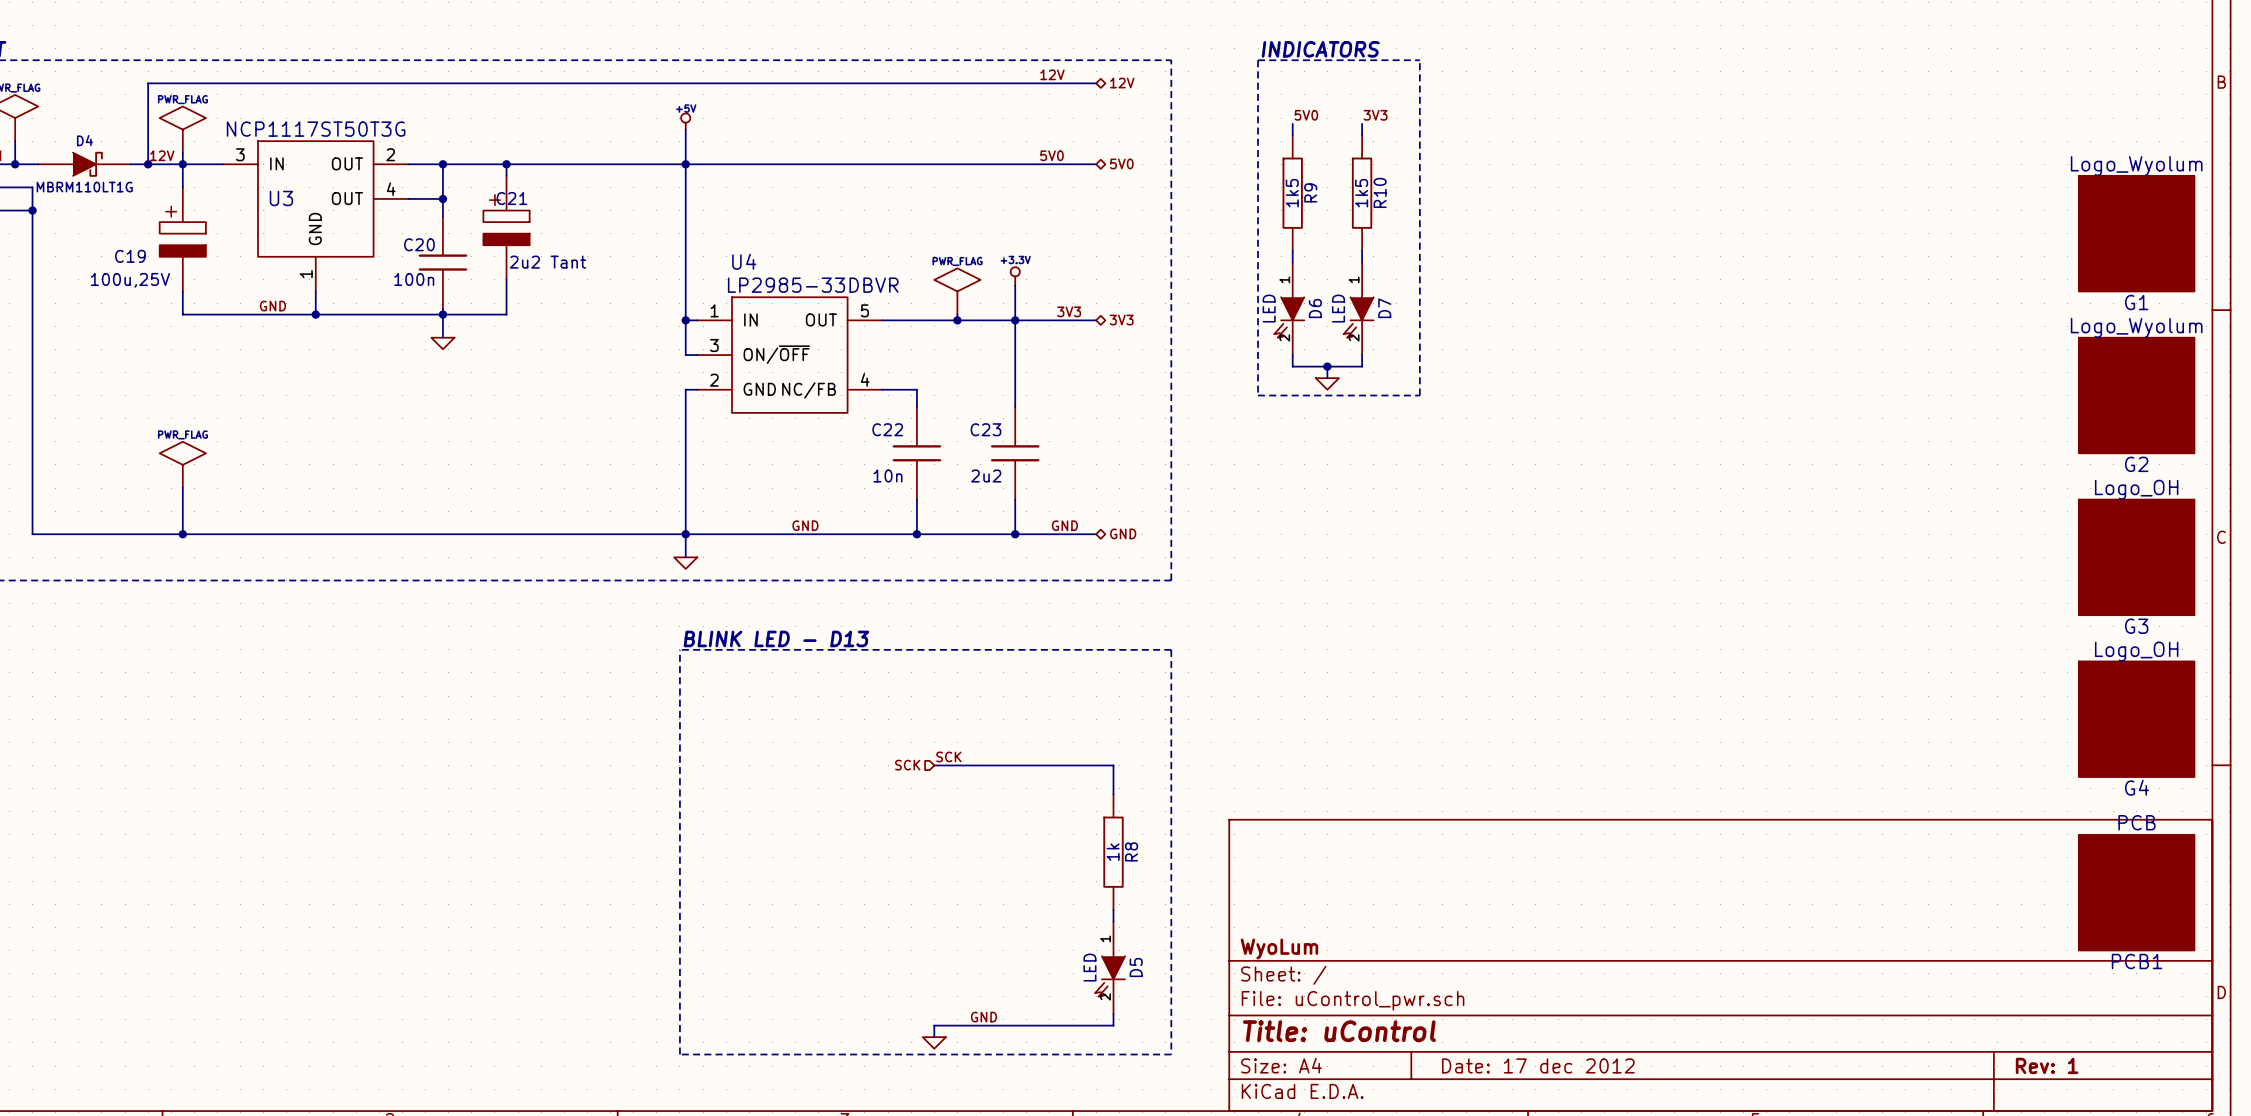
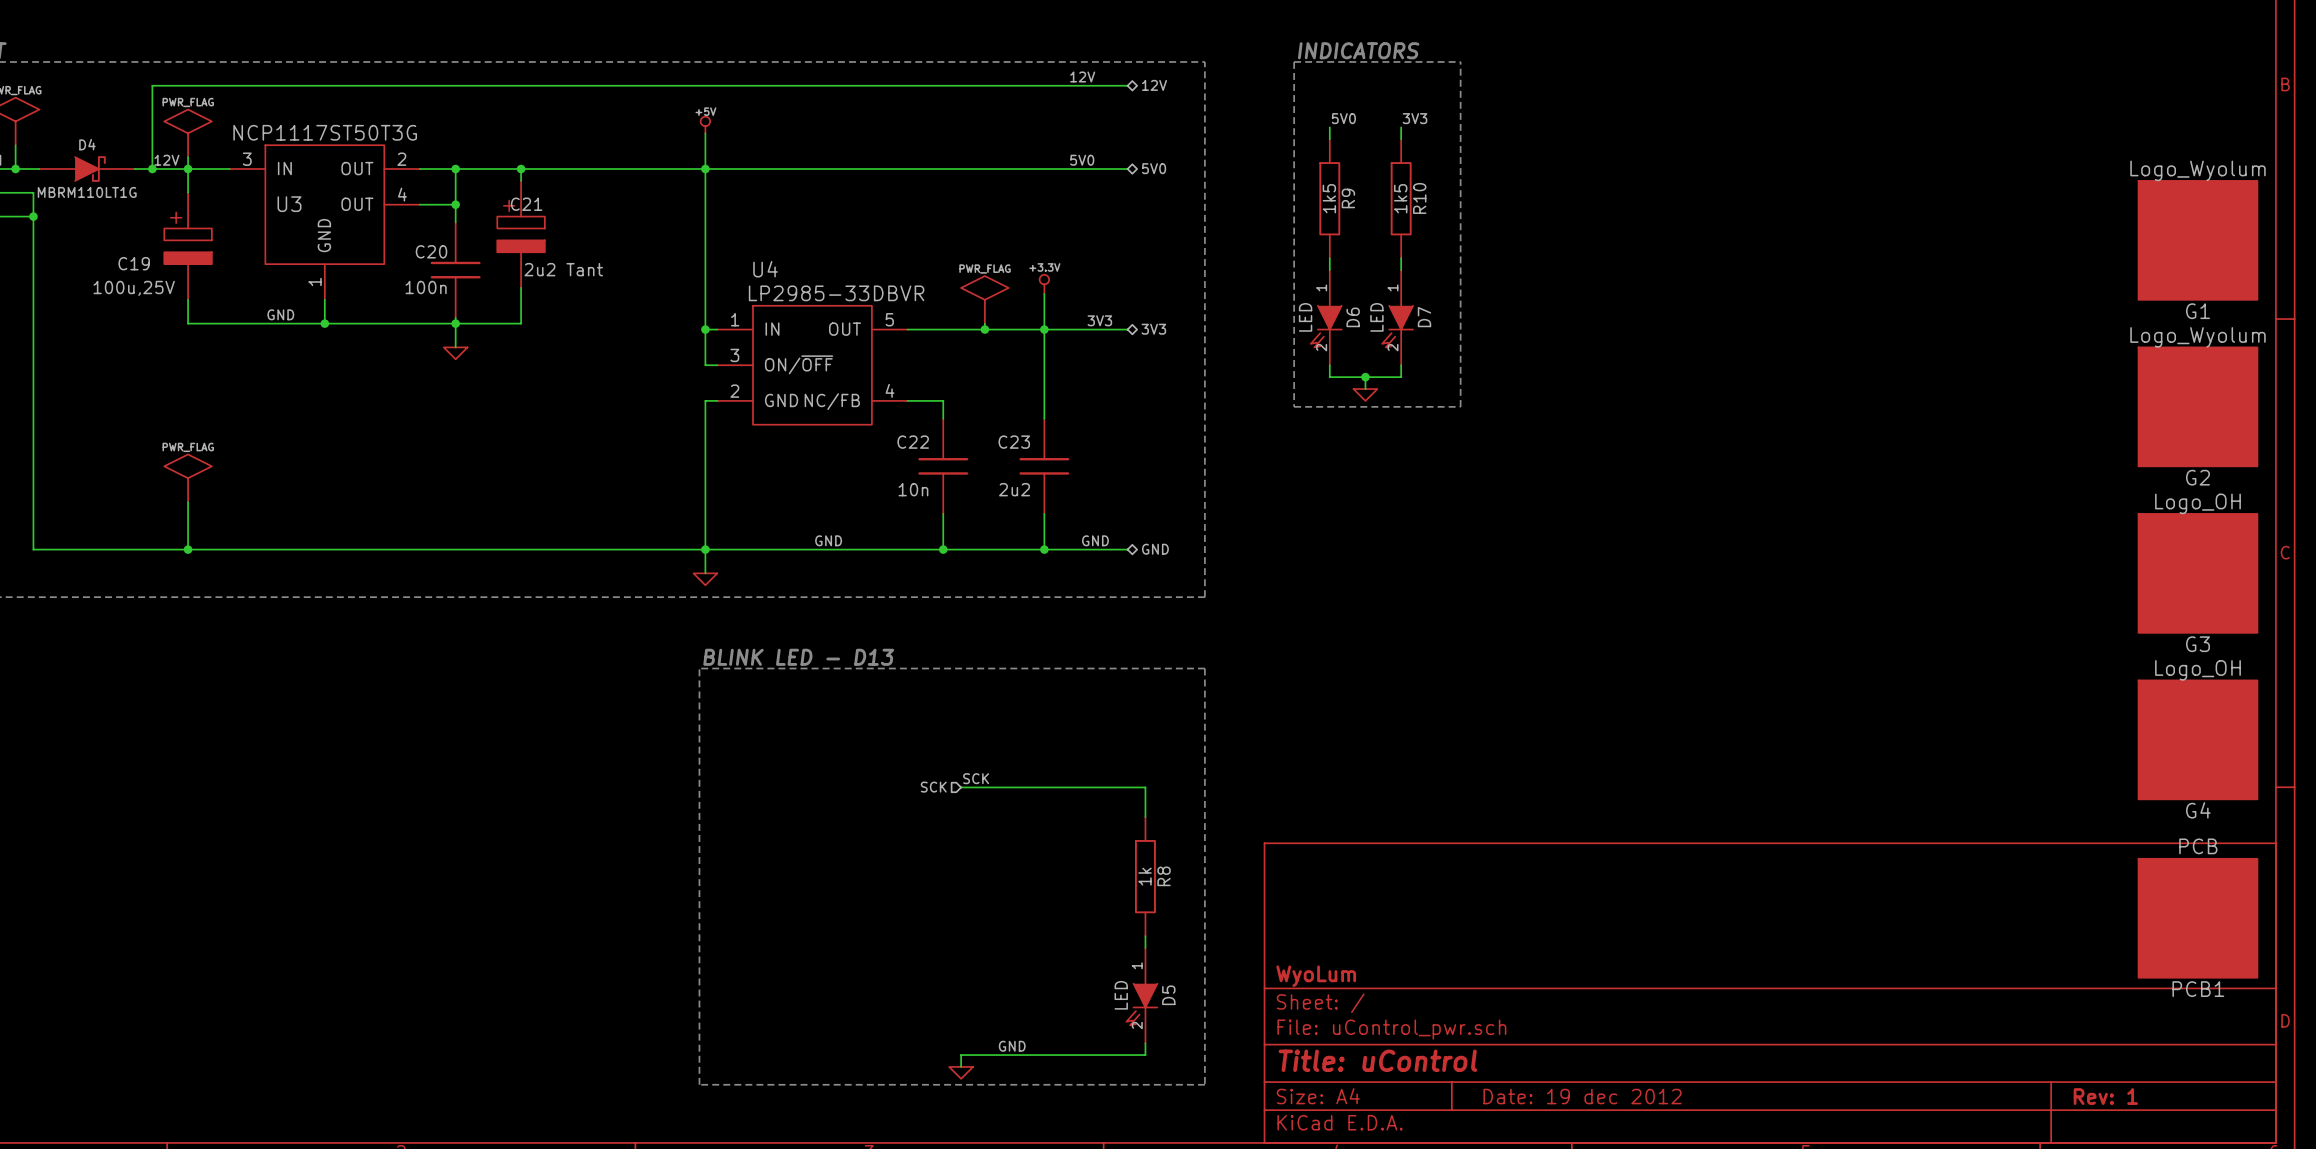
title block: Date: 17 dec 2012 (1538, 1065) -> Date: 19 dec 2012 (1582, 1096)

